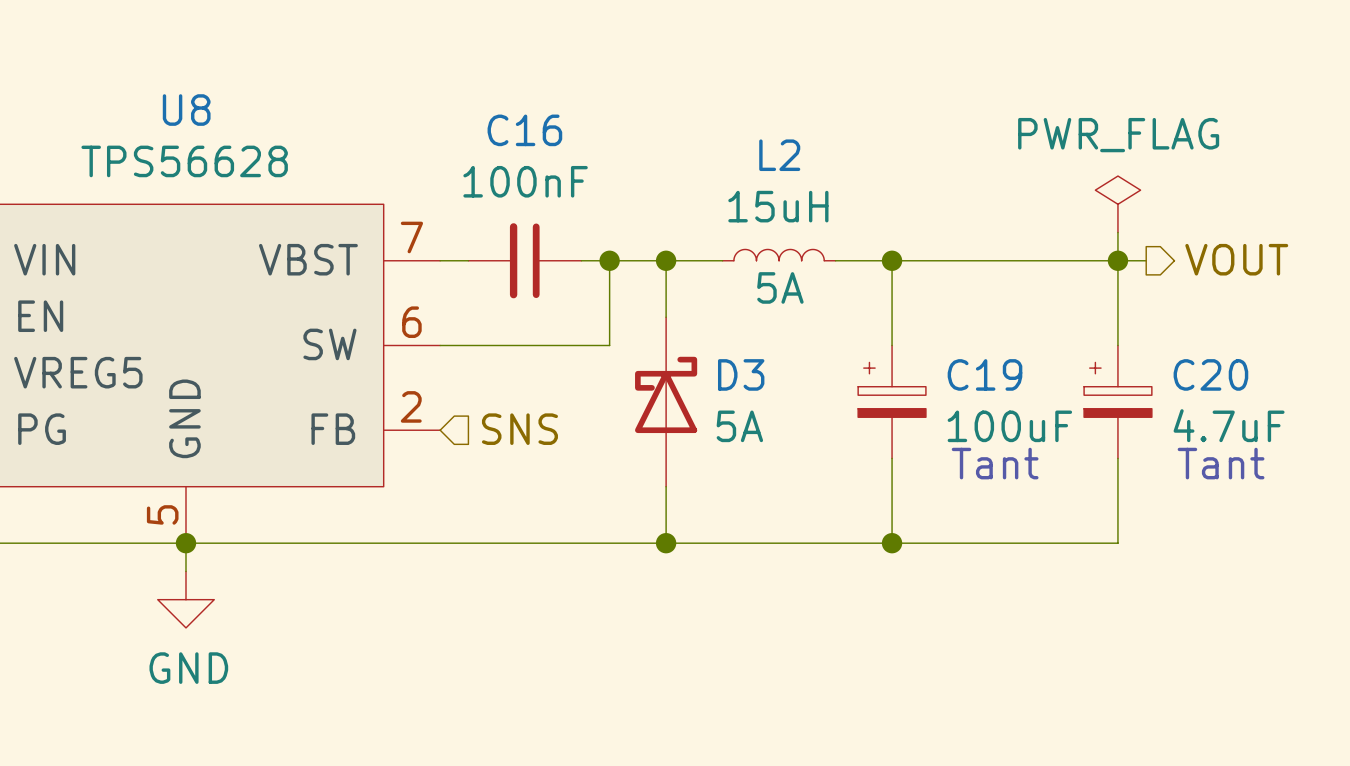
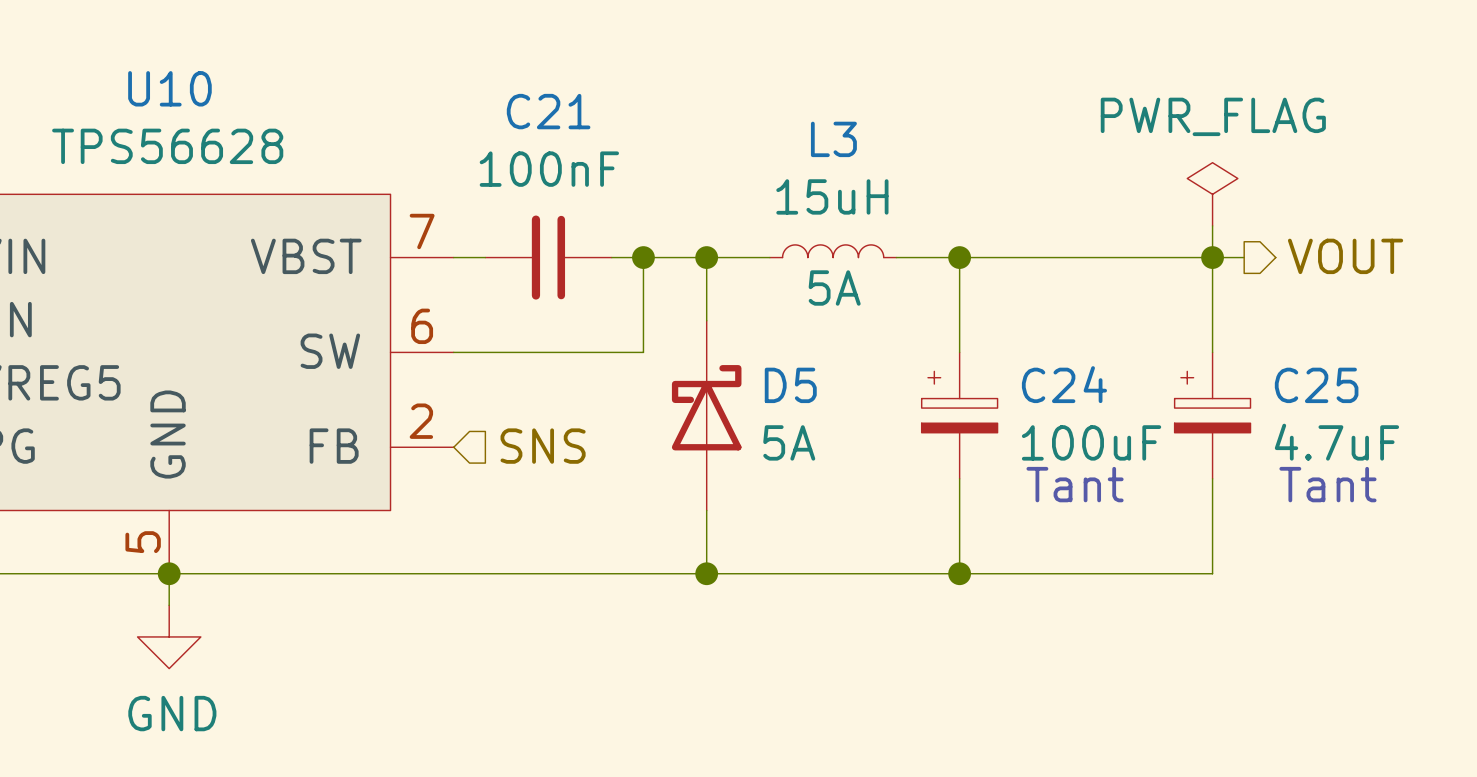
U8 name: U8 (186, 110) -> U10 (169, 88)
C16 name: C16 (524, 130) -> C21 (548, 111)
L2 name: L2 (779, 155) -> L3 (833, 139)
D3 name: D3 (741, 374) -> D5 (790, 385)
C19 name: C19 (984, 374) -> C24 (1064, 384)
C20 name: C20 (1210, 374) -> C25 (1316, 385)

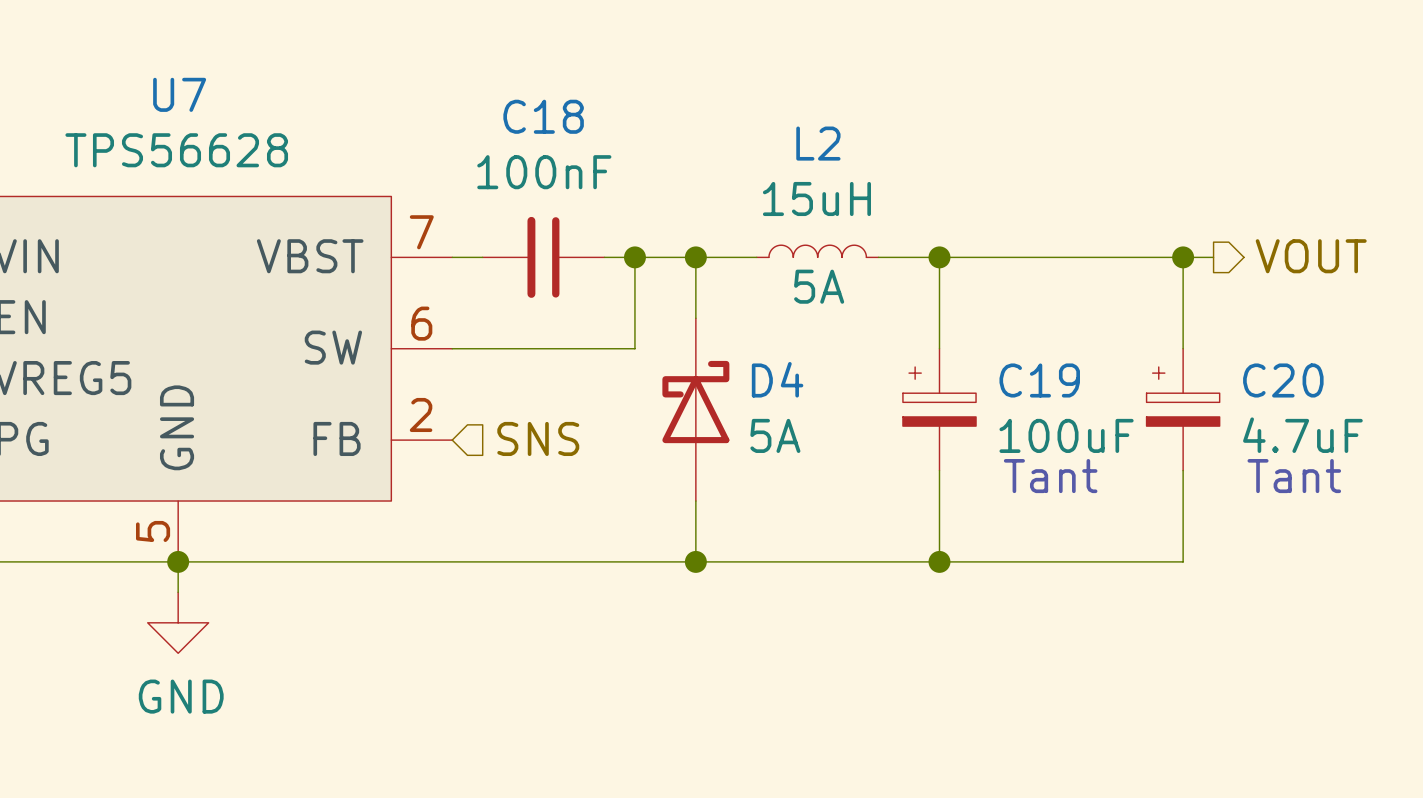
U10 name: U10 (169, 88) -> U7 (179, 94)
C21 name: C21 (548, 111) -> C18 (543, 116)
L3 name: L3 (833, 139) -> L2 (818, 143)
power symbol: PWR_FLAG (1212, 194) -> none
wire: (1212, 225) (1212, 257) -> none
C24 name: C24 (1064, 384) -> C19 (1039, 380)
D5 name: D5 (790, 385) -> D4 (777, 379)
C25 name: C25 (1316, 385) -> C20 (1283, 380)

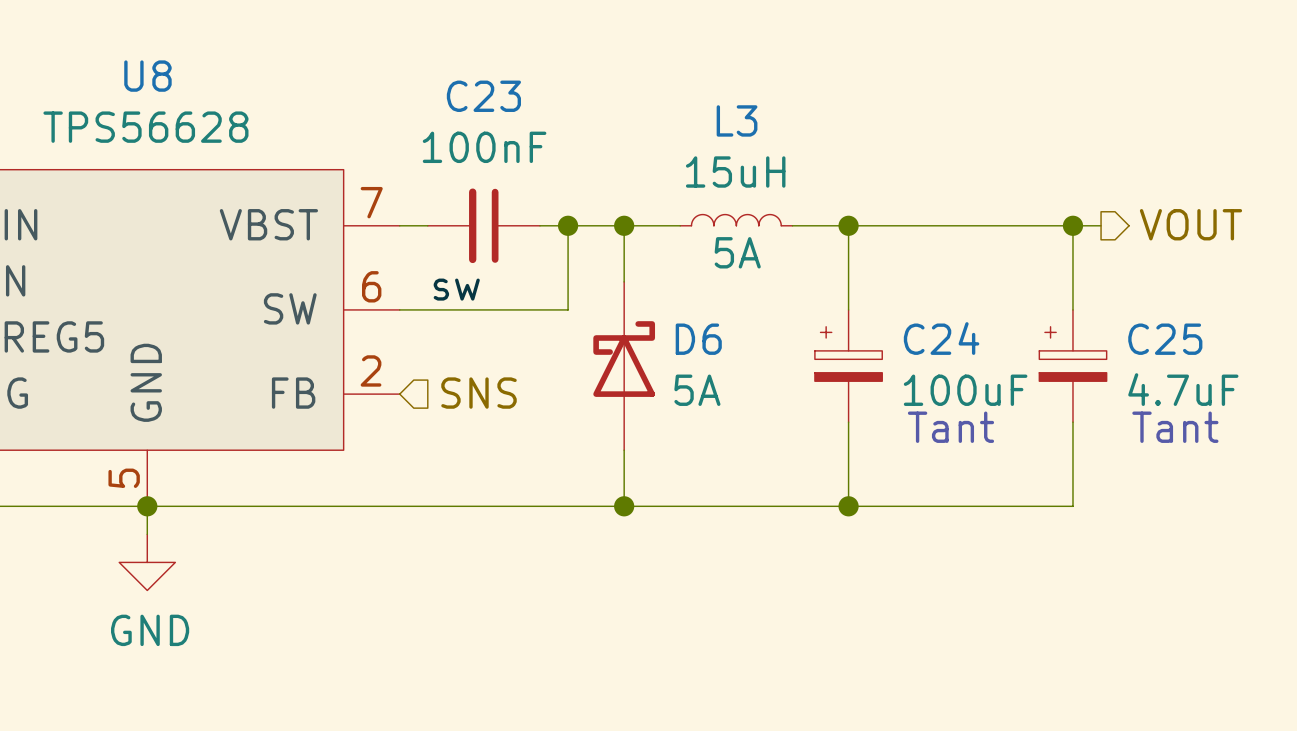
U7 name: U7 (179, 94) -> U8 (147, 76)
C18 name: C18 (543, 116) -> C23 (483, 96)
L2 name: L2 (818, 143) -> L3 (737, 120)
label: none -> sw (456, 289)
D4 name: D4 (777, 379) -> D6 (698, 339)
C19 name: C19 (1039, 380) -> C24 (941, 338)
C20 name: C20 (1283, 380) -> C25 (1165, 339)

